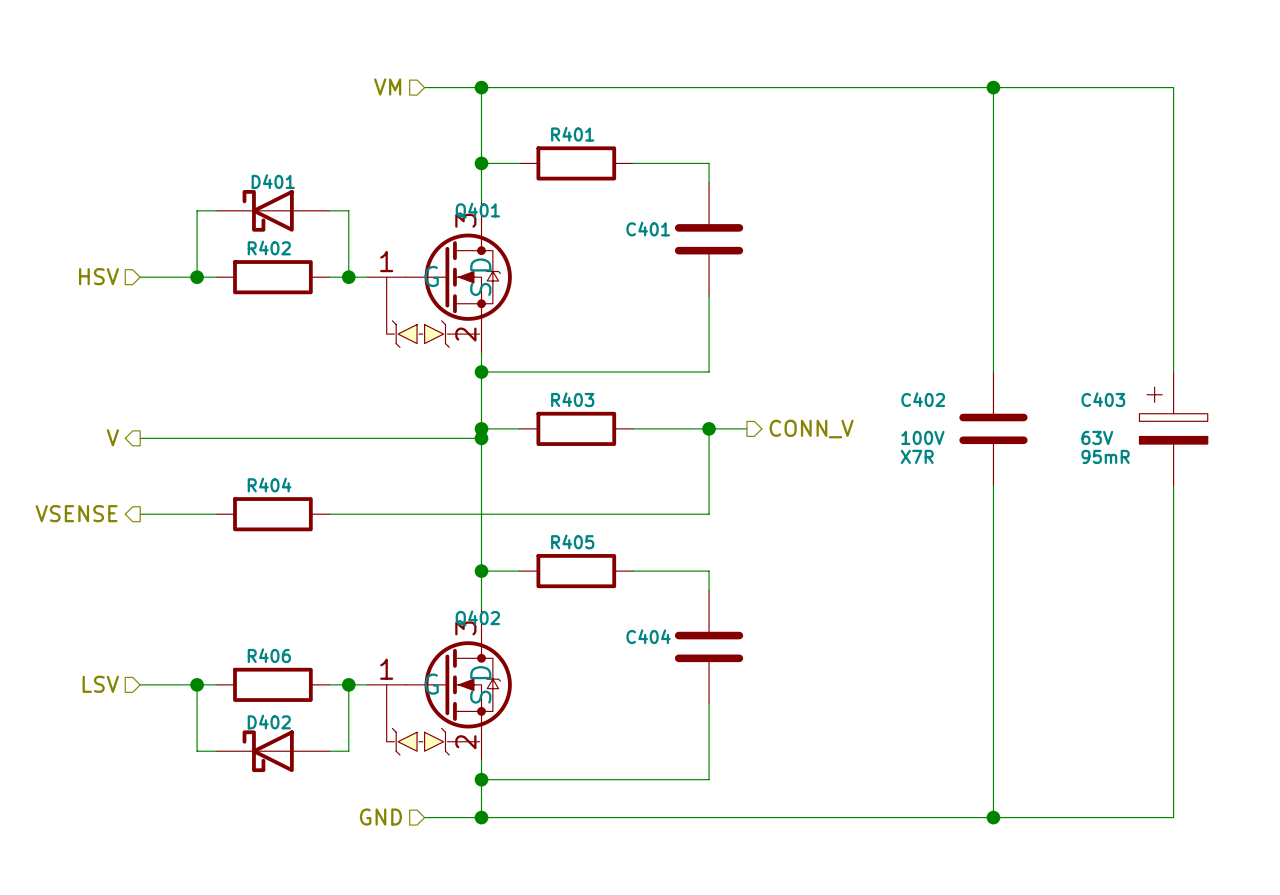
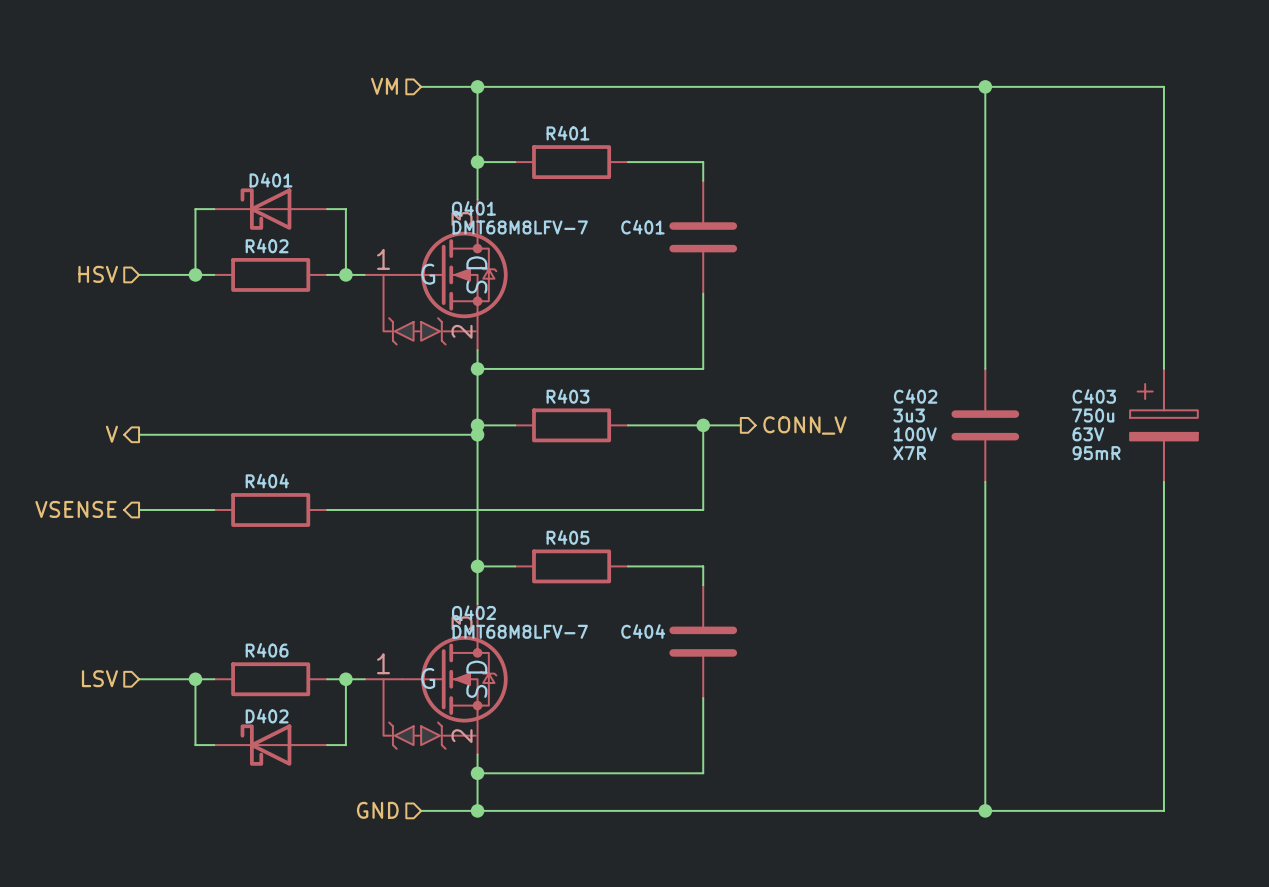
Q401 value: none -> DMT68M8LFV-7 (520, 227)
C402 value: none -> 3u3 (909, 415)
C403 value: none -> 750u (1093, 415)
Q402 value: none -> DMT68M8LFV-7 (520, 631)

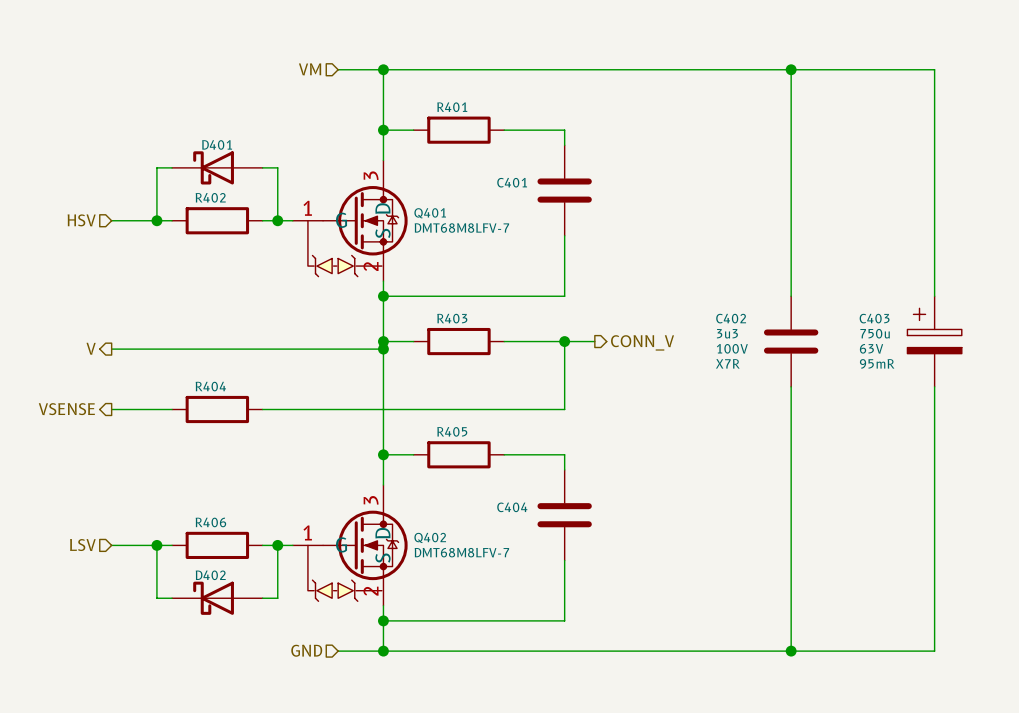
Q401 name position: Q401 (473, 208) -> Q401 (430, 213)
Q401 value position: DMT68M8LFV-7 (520, 227) -> DMT68M8LFV-7 (461, 228)
Q402 name position: Q402 (473, 613) -> Q402 (430, 537)
Q402 value position: DMT68M8LFV-7 (520, 631) -> DMT68M8LFV-7 (461, 552)

